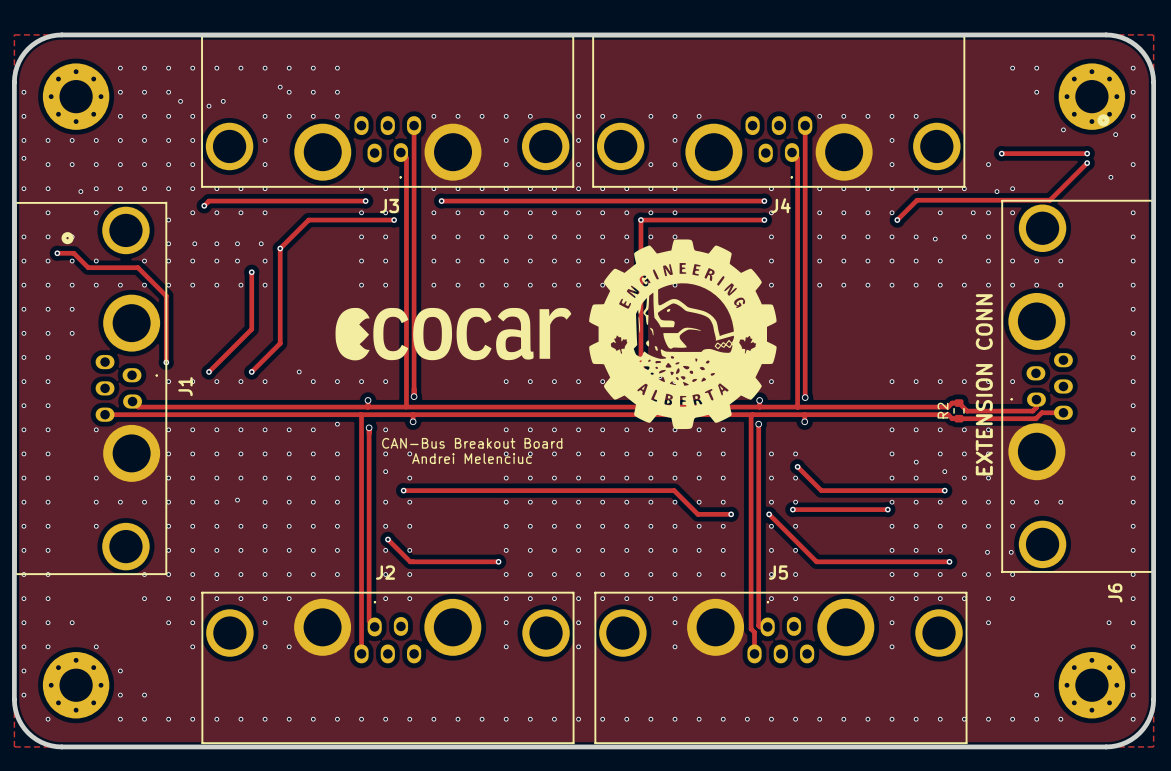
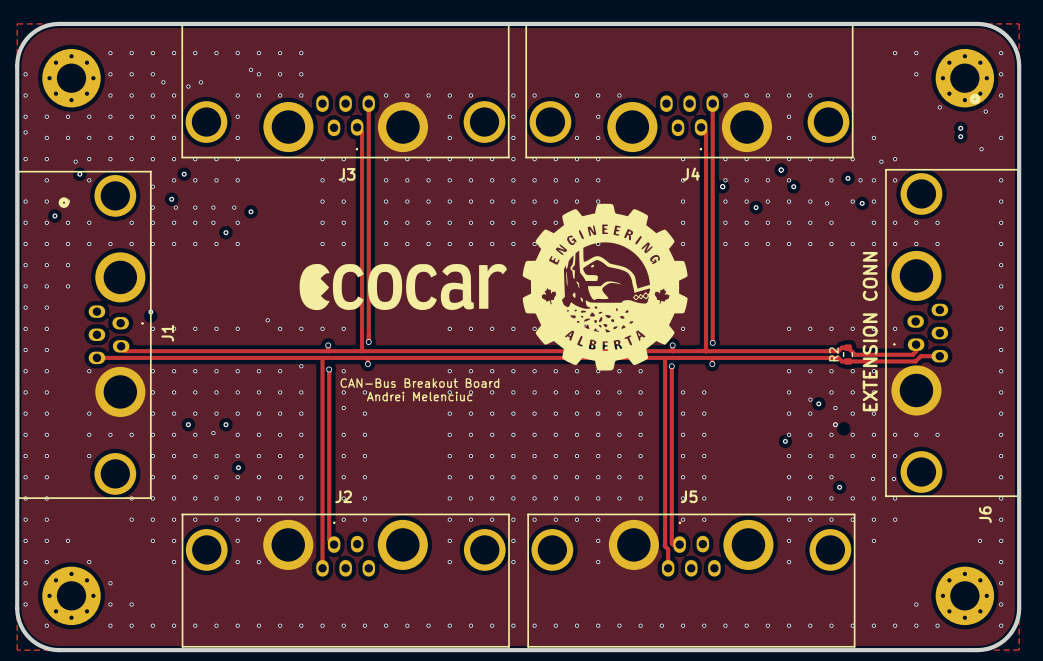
track: (1001, 153) (1087, 153) -> none
via: (1001, 153) -> none
track: (1087, 163) (1050, 200) (917, 200) (897, 220) -> none
track: (365, 201) (209, 201) (204, 205) -> none
via: (365, 201) -> none
track: (441, 201) (764, 201) -> none
via: (441, 201) -> none
via: (764, 201) -> none
via: none -> (781, 170)
via: none -> (79, 174)
via: none -> (847, 178)
track: (394, 220) (308, 220) (280, 248) (280, 343) (251, 371) -> none
via: (394, 220) -> none
via: (640, 220) -> none
track: (764, 220) (640, 220) (640, 367) (645, 371) -> none
via: (764, 220) -> none
via: none -> (722, 186)
via: none -> (171, 199)
via: none -> (862, 203)
via: none -> (756, 207)
track: (57, 253) (73, 253) (88, 267) (137, 267) (166, 296) (166, 362) -> none
track: (251, 272) (251, 329) (209, 371) -> none
via: (209, 371) -> none
via: (251, 371) -> none
track: (797, 466) (821, 490) (944, 490) -> none
via: (797, 466) -> none
via: none -> (818, 403)
via: none -> (188, 424)
via: none -> (225, 424)
track: (403, 490) (674, 490) (697, 514) (731, 514) -> none
via: (403, 490) -> none
track: (792, 509) (887, 509) -> none
via: (792, 509) -> none
via: (731, 514) -> none
track: (769, 514) (816, 561) (949, 561) -> none
via: (769, 514) -> none
via: none -> (238, 467)
track: (387, 539) (410, 561) (498, 561) -> none
via: (387, 539) -> none
via: (498, 561) -> none

